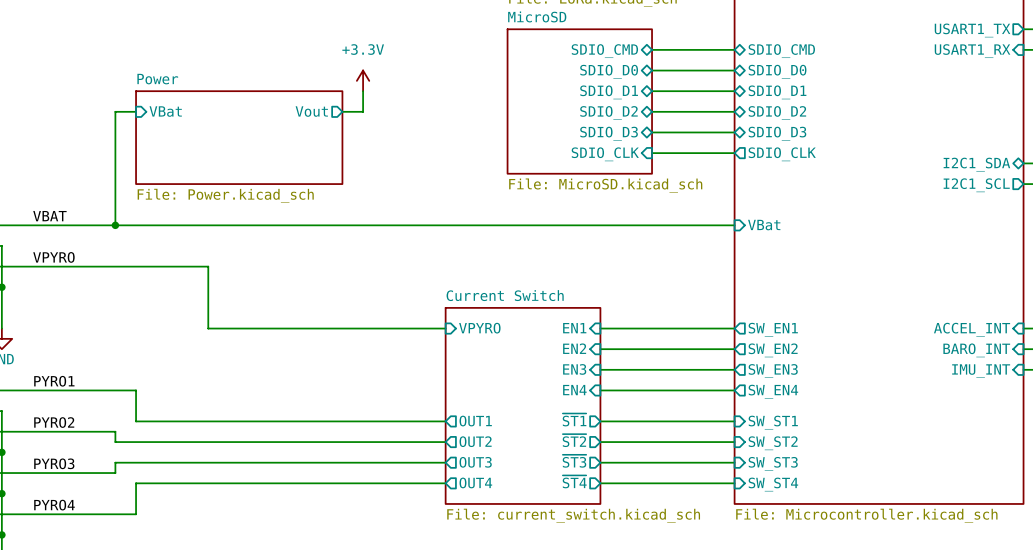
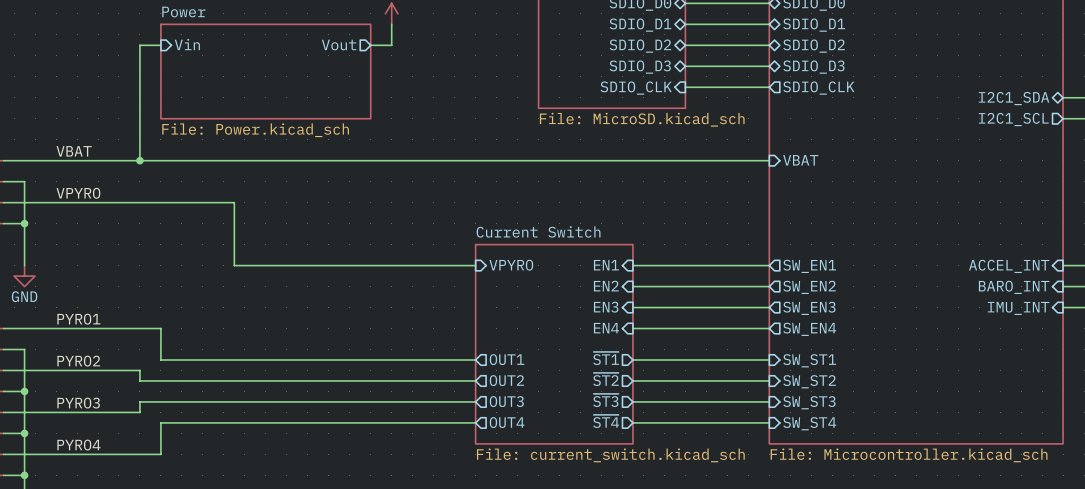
sheet pin: VBat (165, 111) -> Vin (187, 44)
sheet pin: VBat (764, 225) -> VBAT (800, 160)

